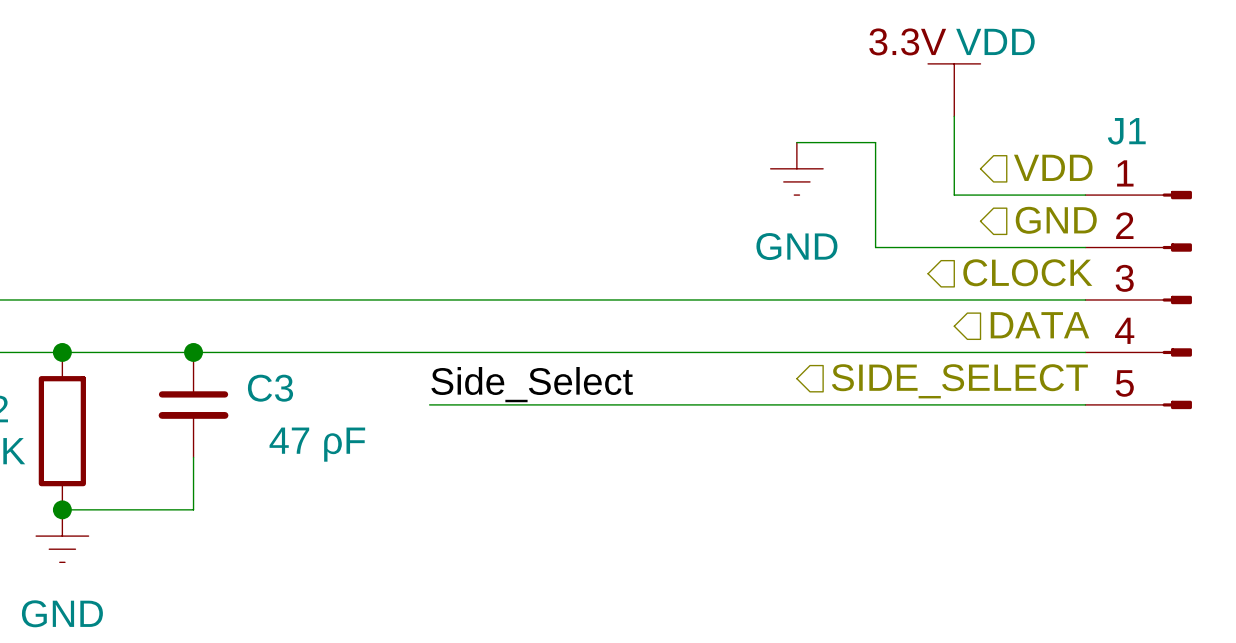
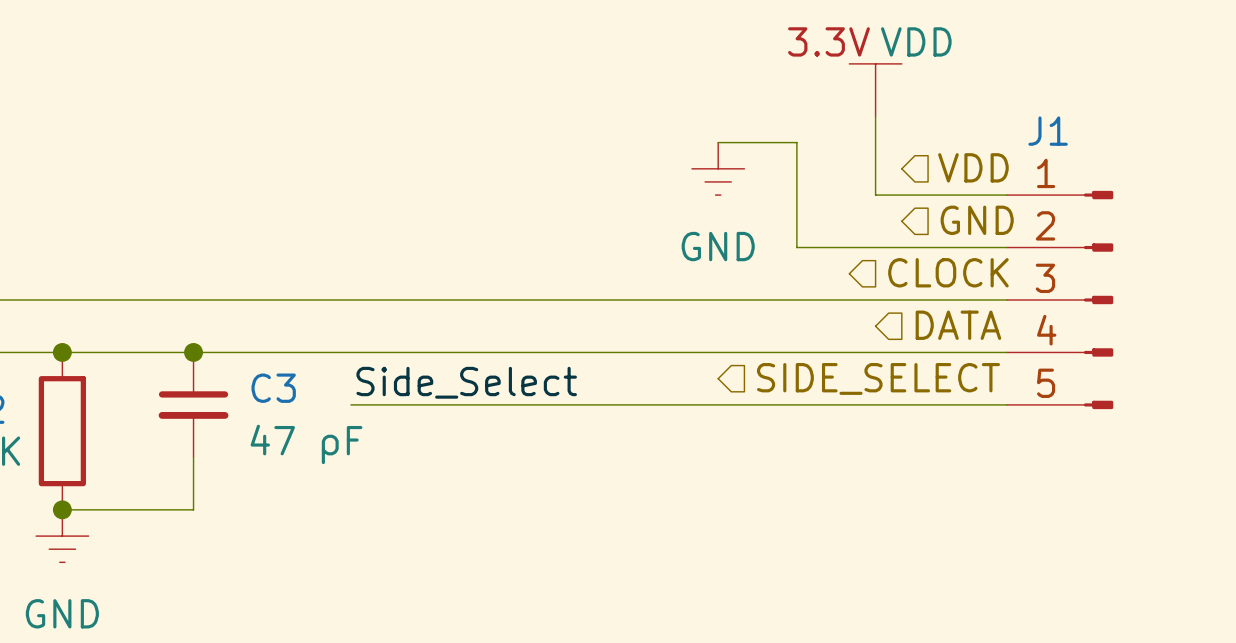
power symbol position: VDD (954, 90) -> VDD (875, 90)
wire: (954, 116) (954, 195) -> none
wire: none -> (718, 142) (796, 142) (796, 247) (875, 247)
wire: (796, 142) (875, 142) -> (875, 116) (875, 142)
hierarchical label position: VDD (1053, 167) -> VDD (973, 167)
power symbol position: GND (796, 168) -> GND (718, 168)
wire: (875, 195) (875, 247) -> (875, 195) (954, 195)
hierarchical label position: GND (1056, 220) -> GND (977, 220)
hierarchical label position: CLOCK (1027, 272) -> CLOCK (948, 272)
J1 position: (1138, 299) -> (1060, 299)
hierarchical label position: DATA (1039, 325) -> DATA (958, 325)
hierarchical label position: SIDE_SELECT (959, 381) -> SIDE_SELECT (878, 378)
label position: Side_Select (532, 384) -> Side_Select (466, 382)
wire: none -> (350, 404) (429, 404)

